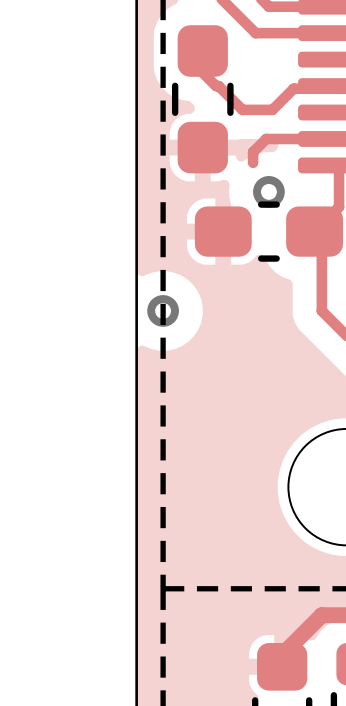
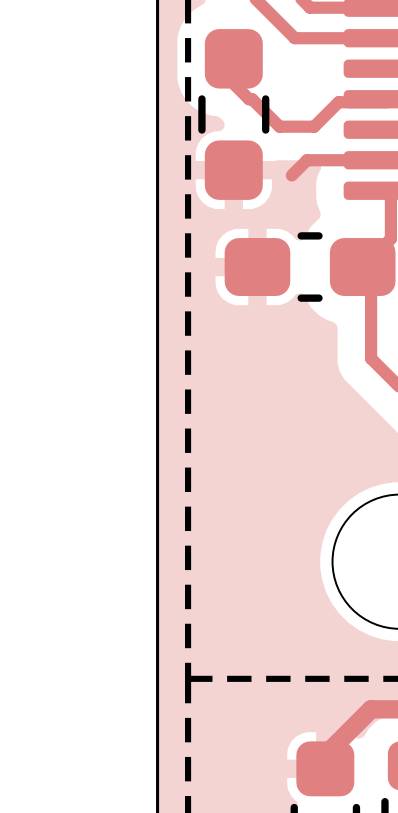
track: (253, 152) (253, 162) -> none
via: (268, 191) -> none
via: (163, 310) -> none

